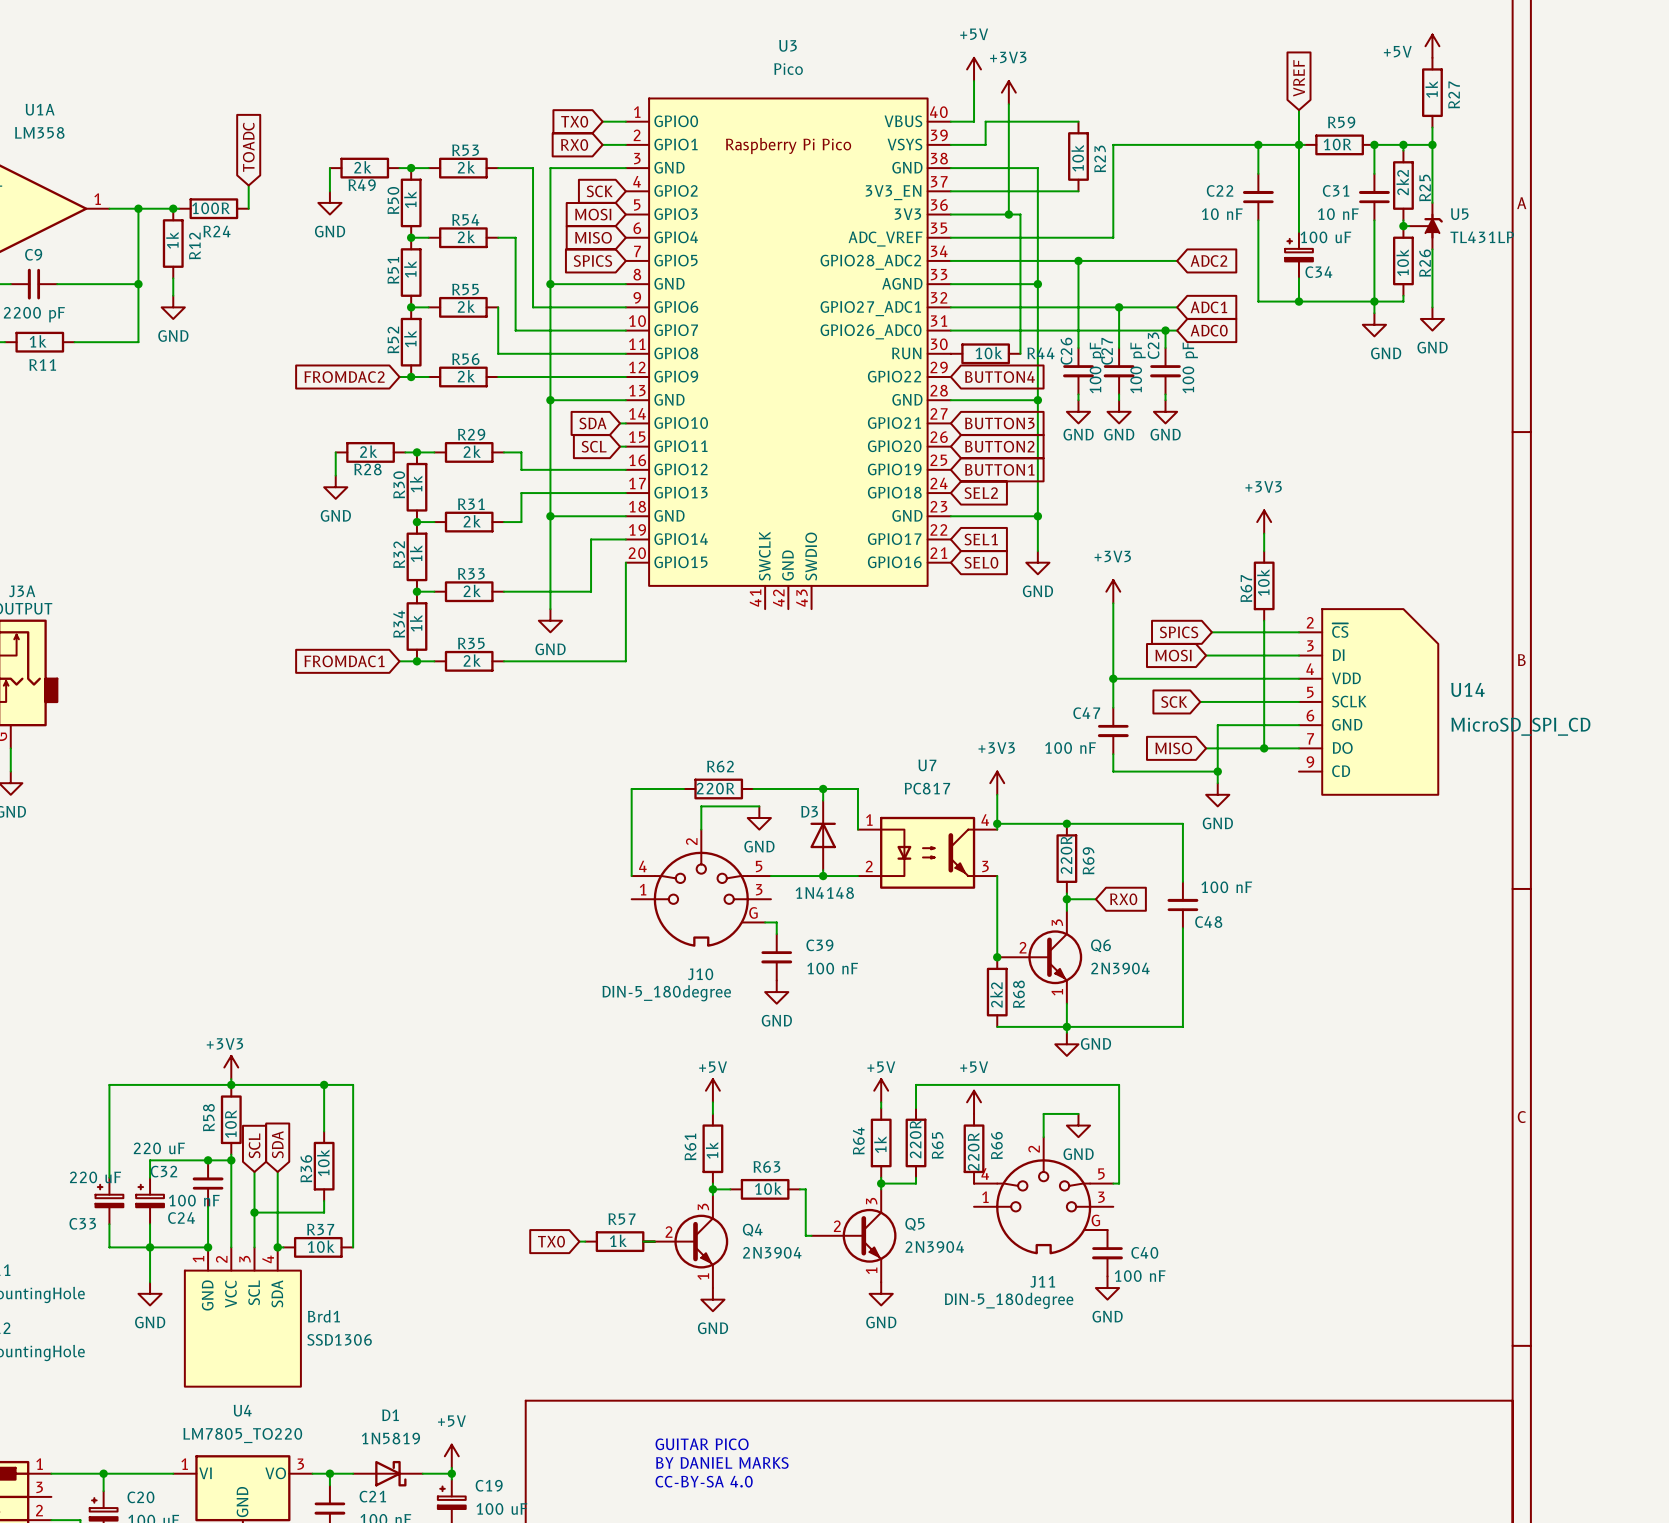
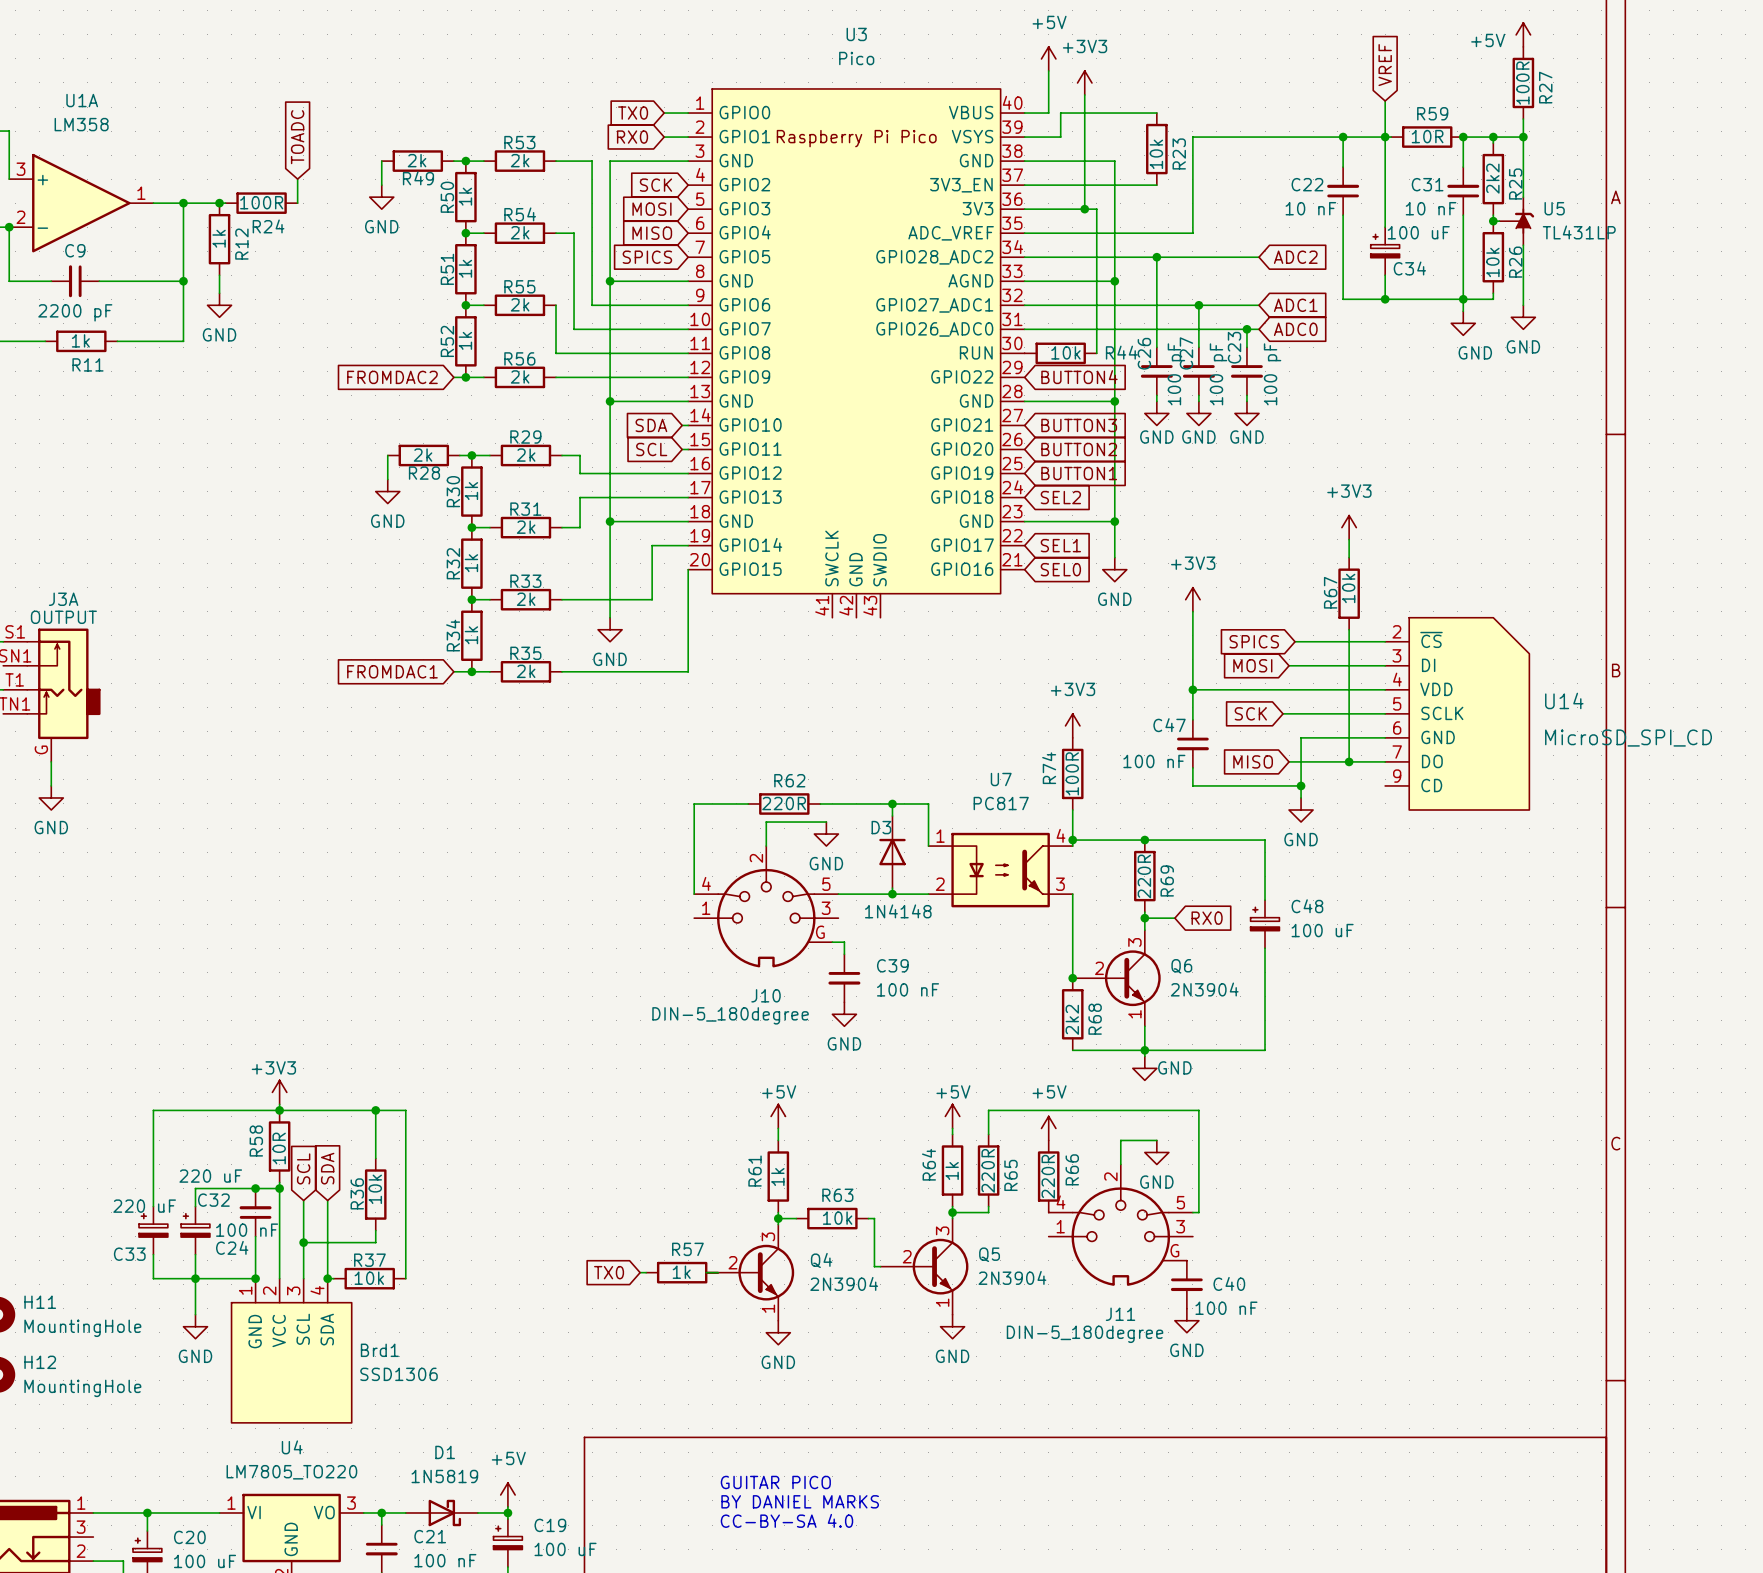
R27 value: 1k (1431, 89) -> 100R (1522, 83)
R74: none -> 100R (1072, 773)
power symbol position: +3V3 (997, 783) -> +3V3 (1072, 725)
C48 symbol: [1167, 881, 1199, 929] -> [1250, 900, 1280, 949]
C48 value: 100 nF (1226, 887) -> 100 uF (1322, 930)
C48 name position: C48 (1208, 922) -> C48 (1307, 906)

